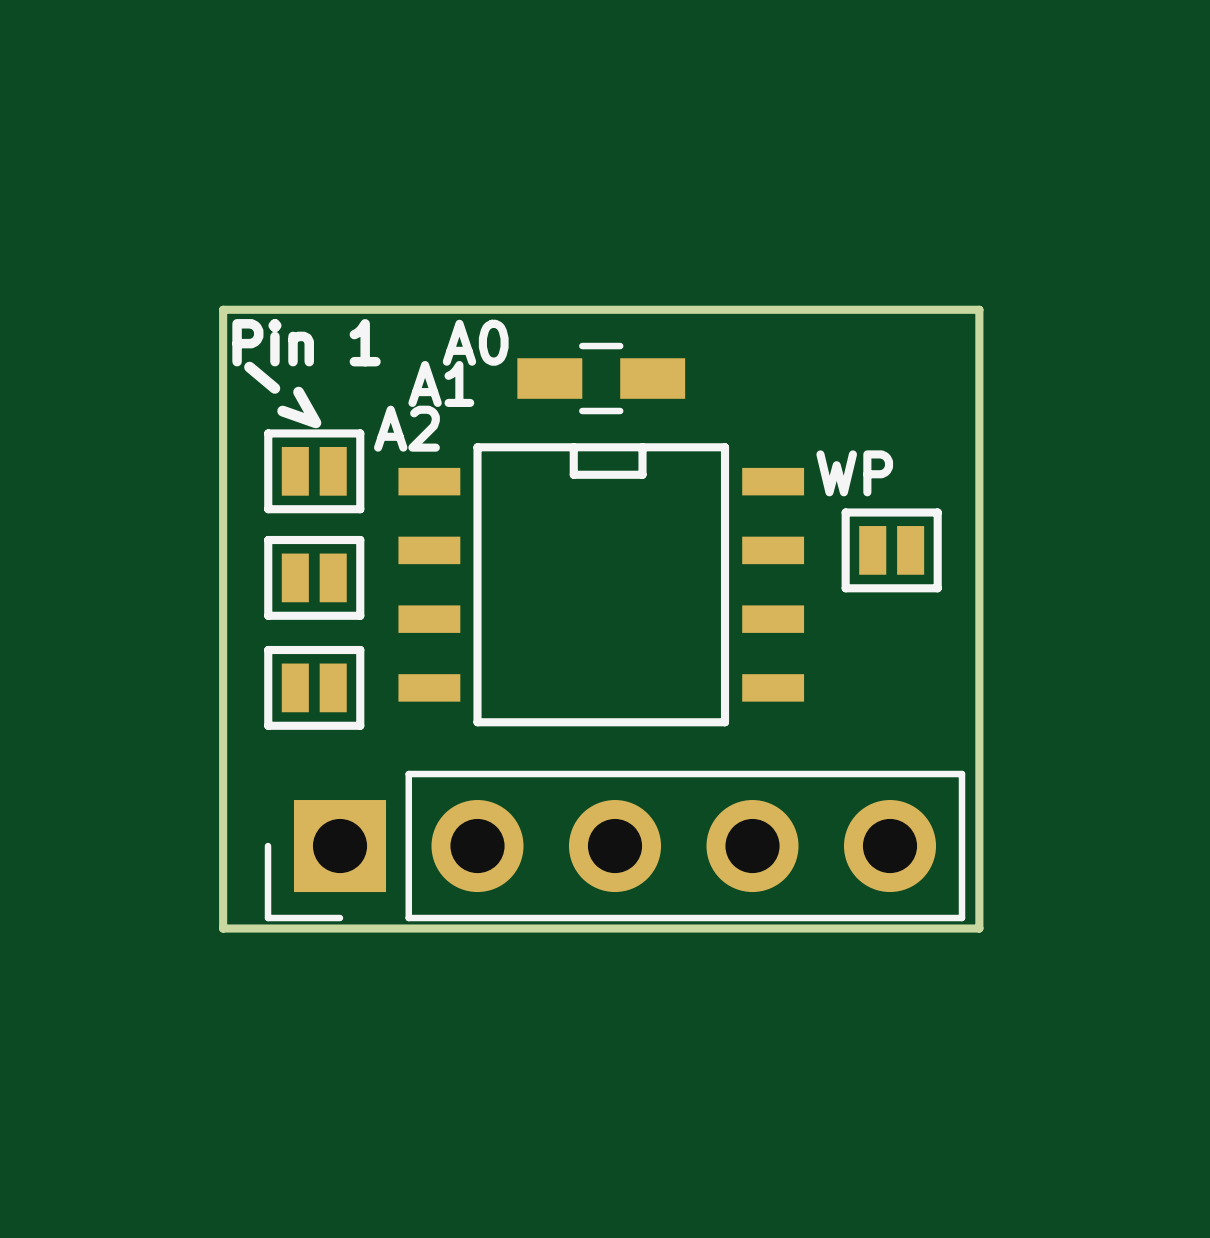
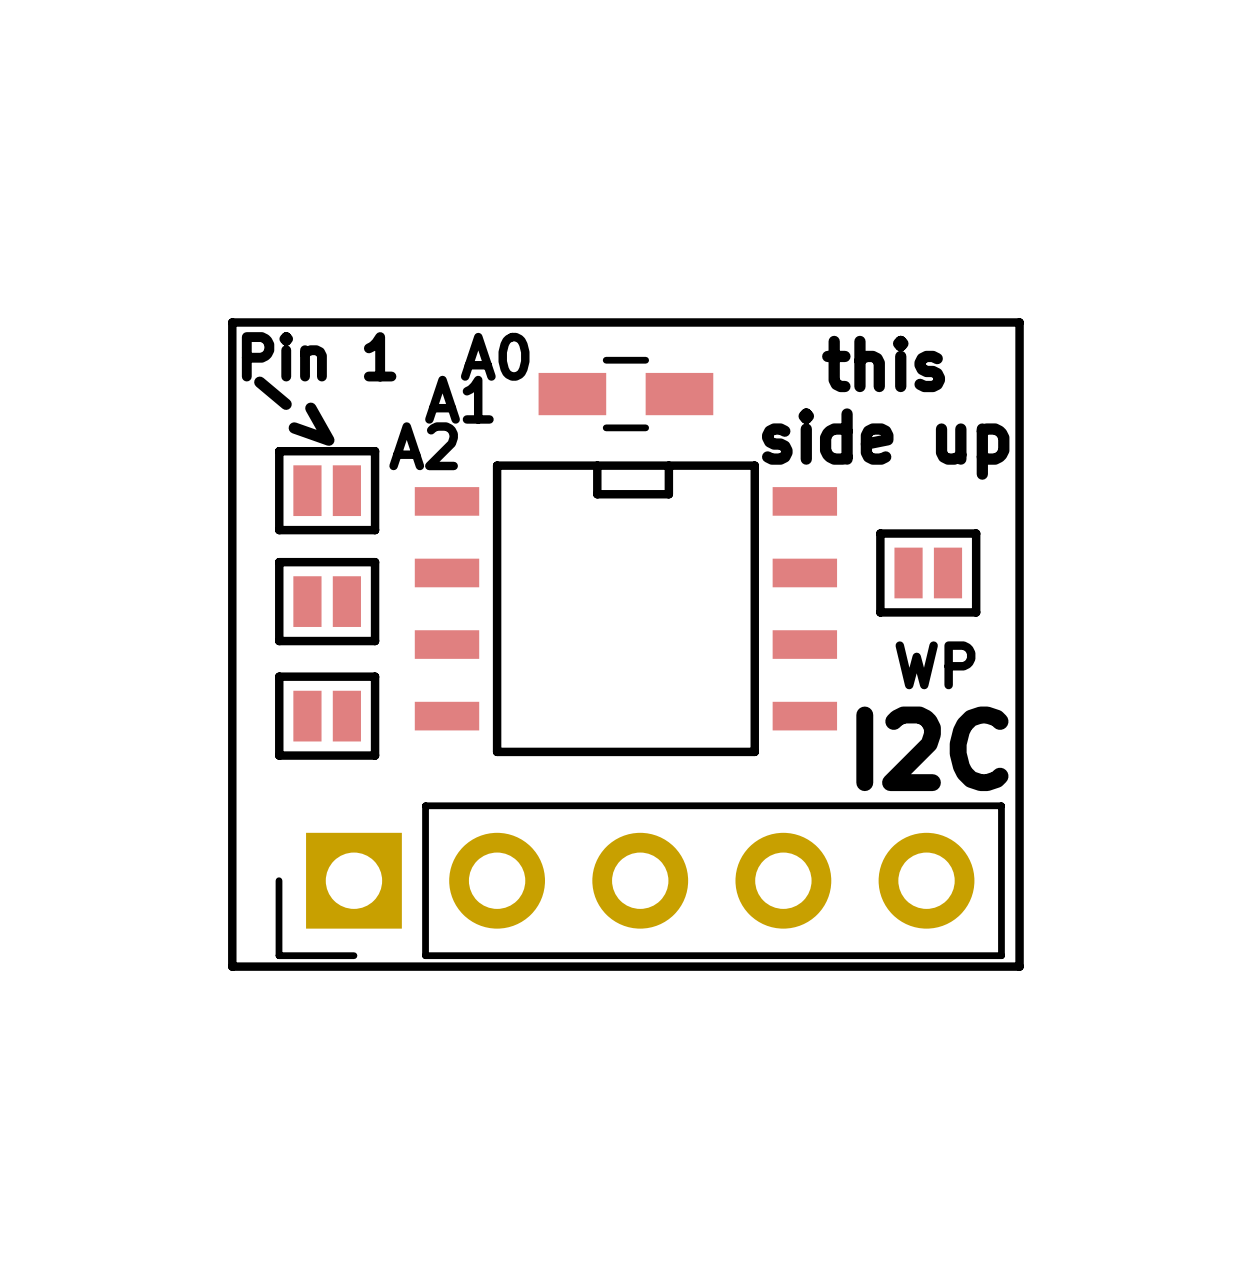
text: none -> this (883, 363)
text: none -> side up (885, 444)
part value position: WP (854, 473) -> WP (935, 665)
text: none -> I2C (932, 748)

